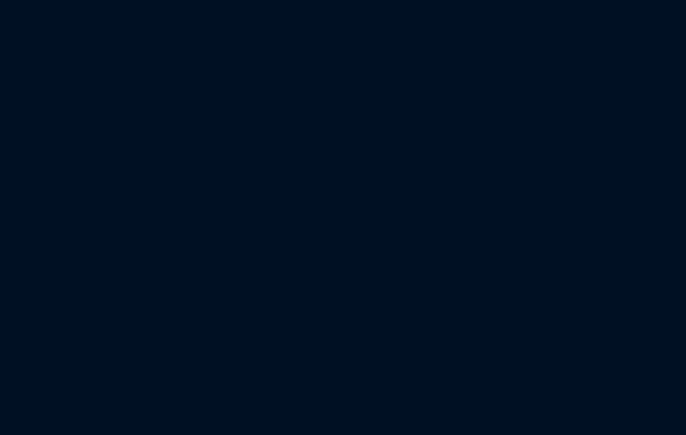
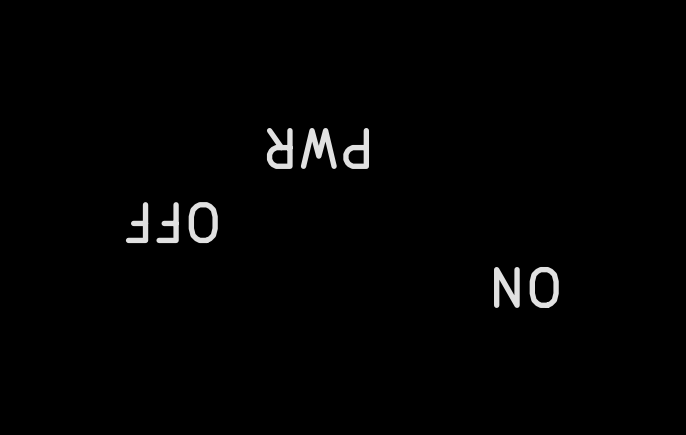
text: none -> PWR (317, 148)
text: none -> OFF (171, 222)
text: none -> ON (526, 287)

